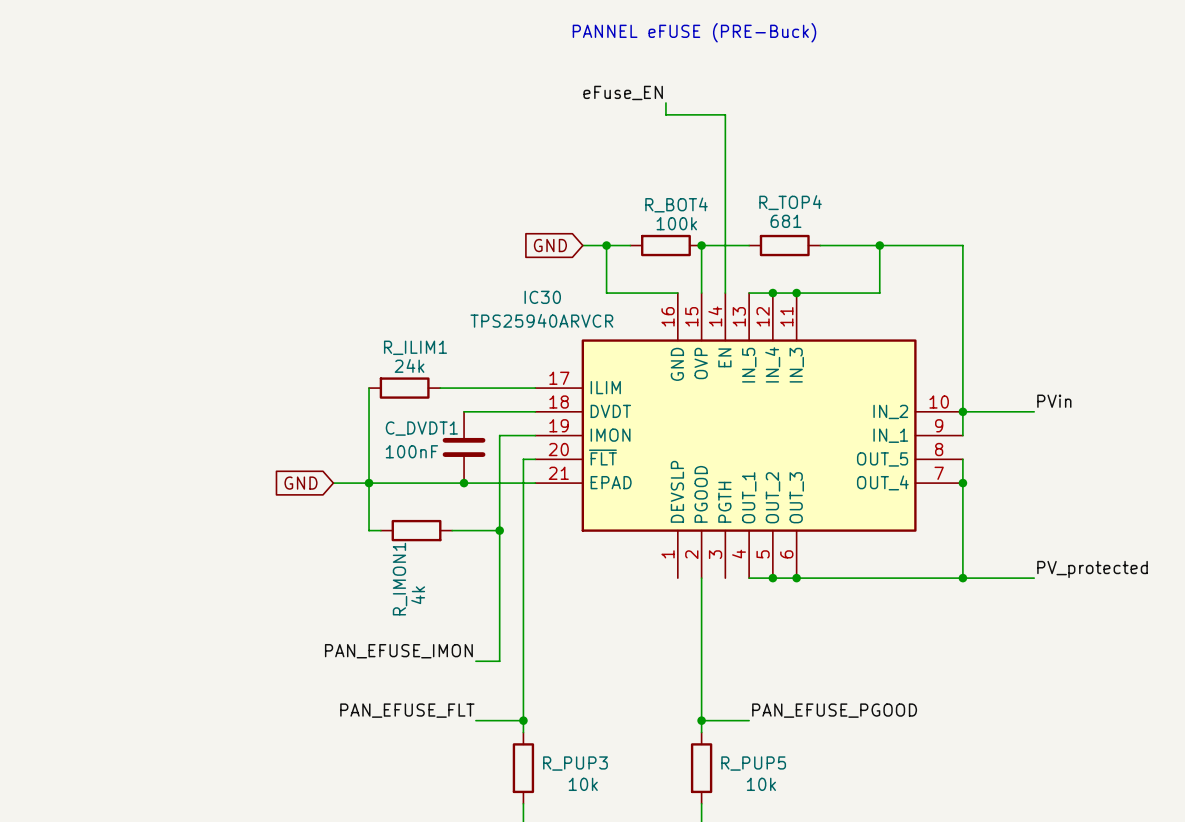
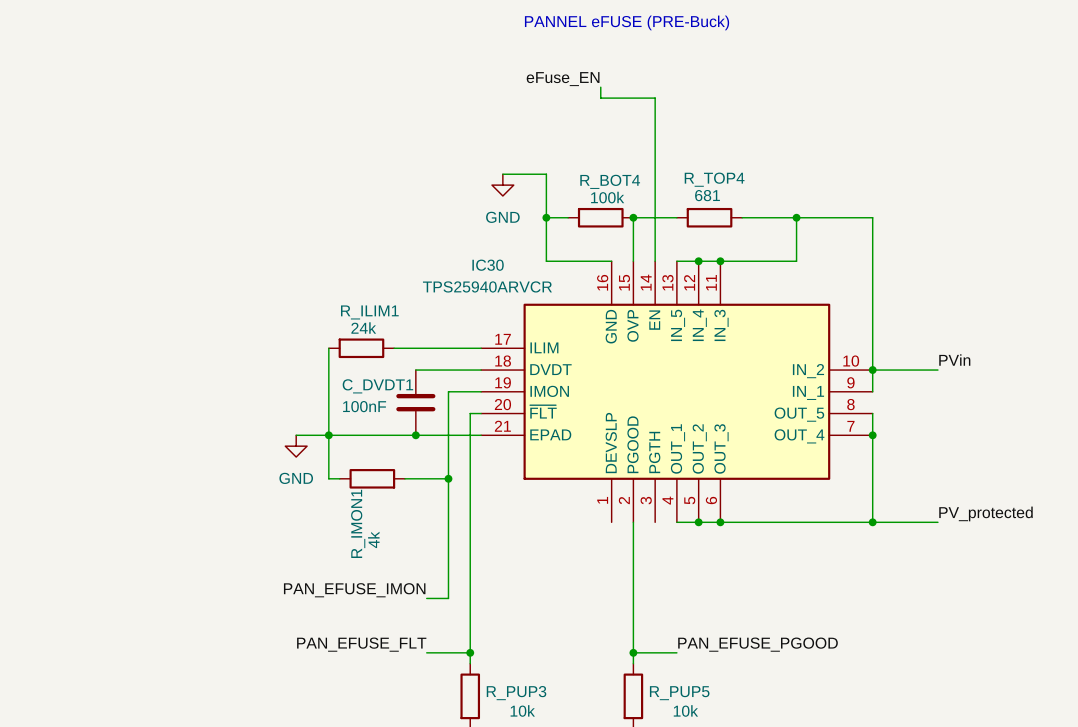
power symbol: none -> GND (502, 185)
global label: GND (550, 245) -> none
wire: (582, 245) (606, 245) -> (502, 174) (546, 174) (546, 217)
global label: GND (300, 483) -> none
power symbol: none -> GND (296, 446)

